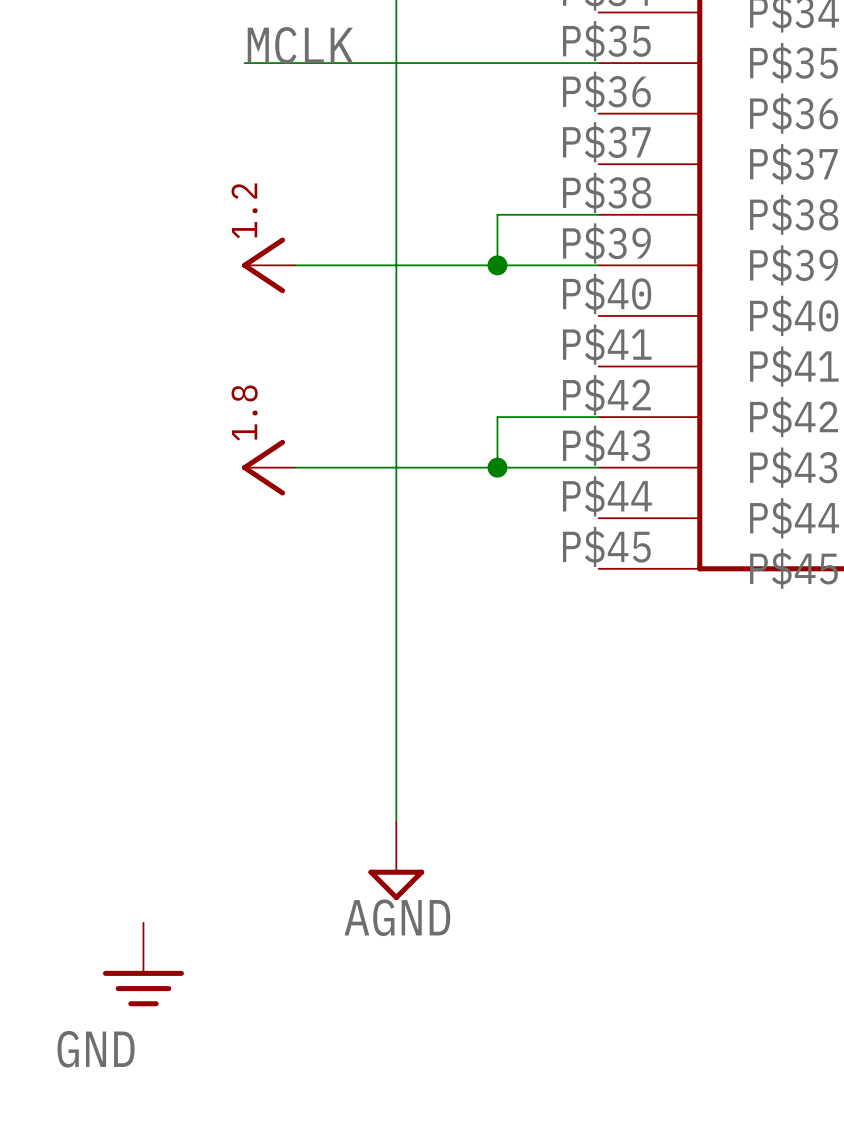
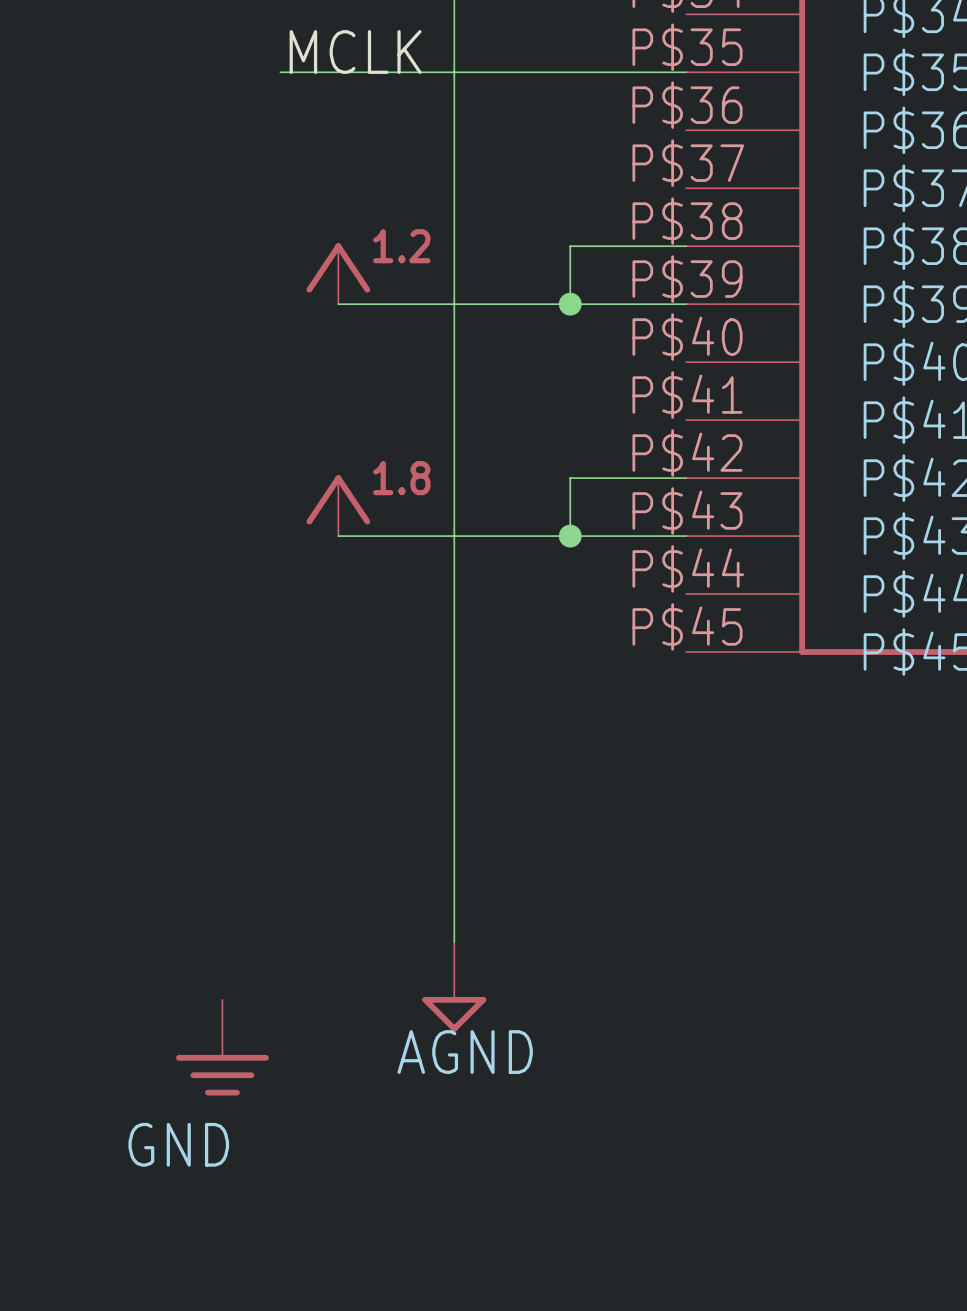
power symbol rotation: 0° (263, 265) -> 90° clockwise (338, 267)
power symbol position: (268, 265) -> (338, 273)
power symbol rotation: 0° (263, 467) -> 90° clockwise (338, 499)
power symbol position: (268, 467) -> (338, 505)
power symbol position: GND (143, 964) -> GND (222, 1047)

